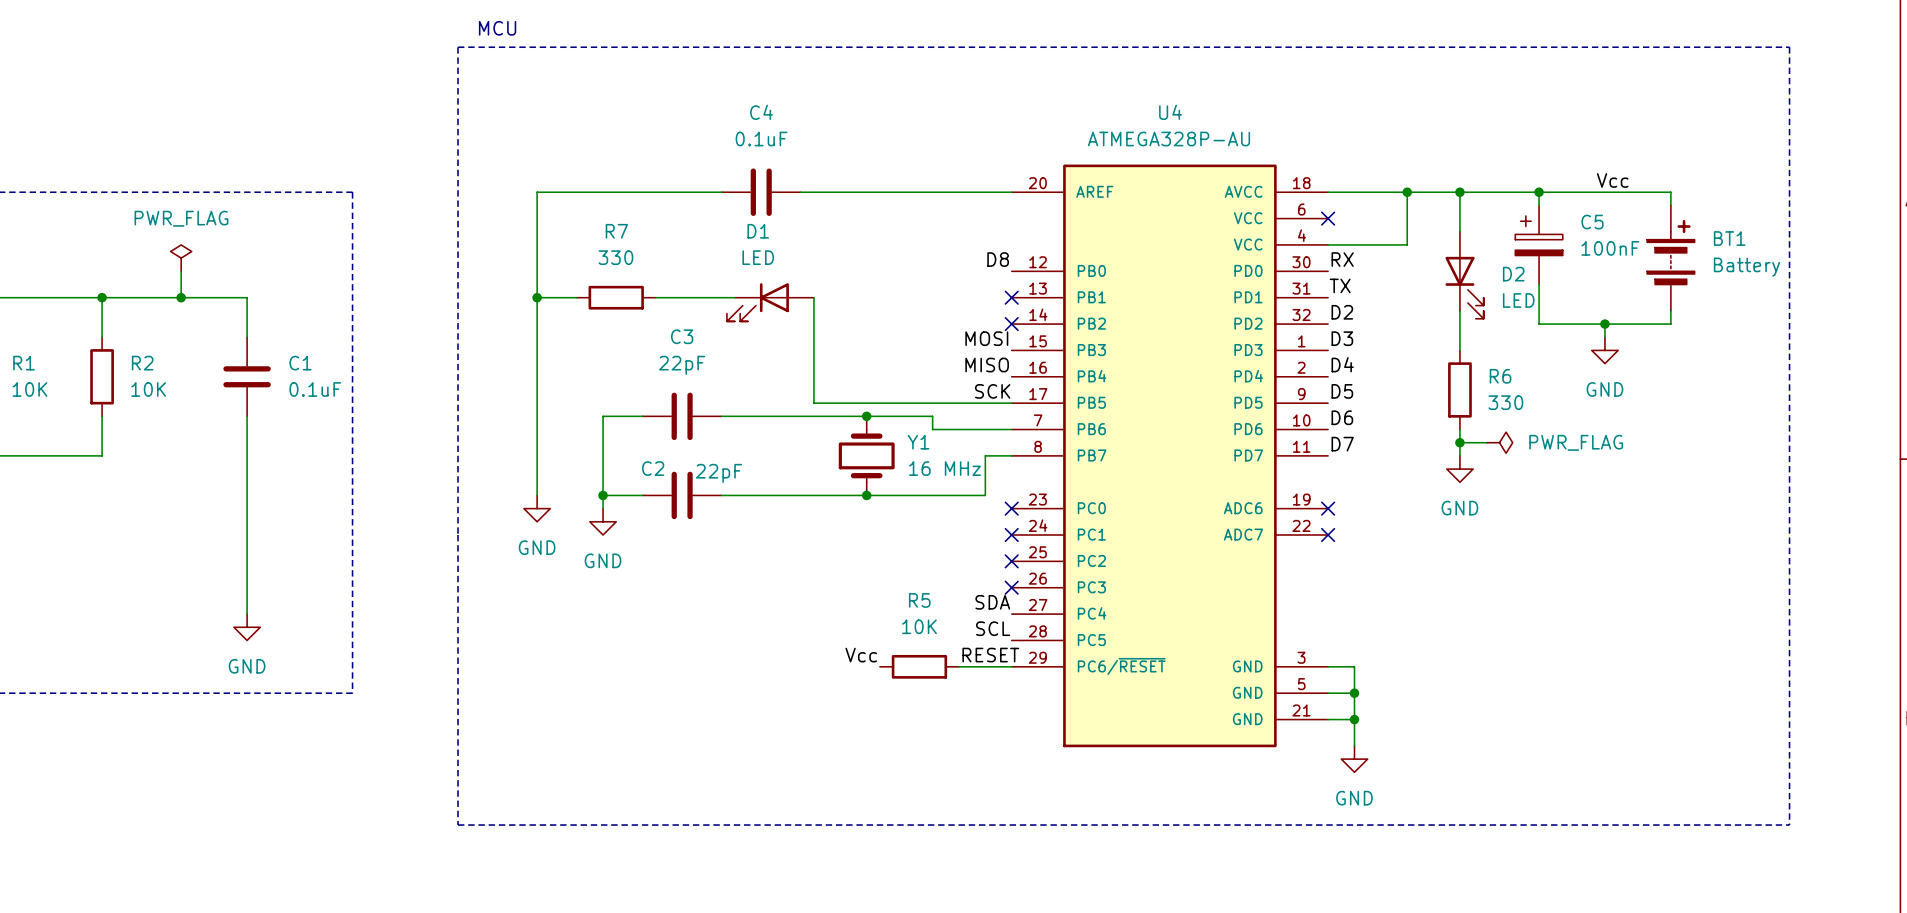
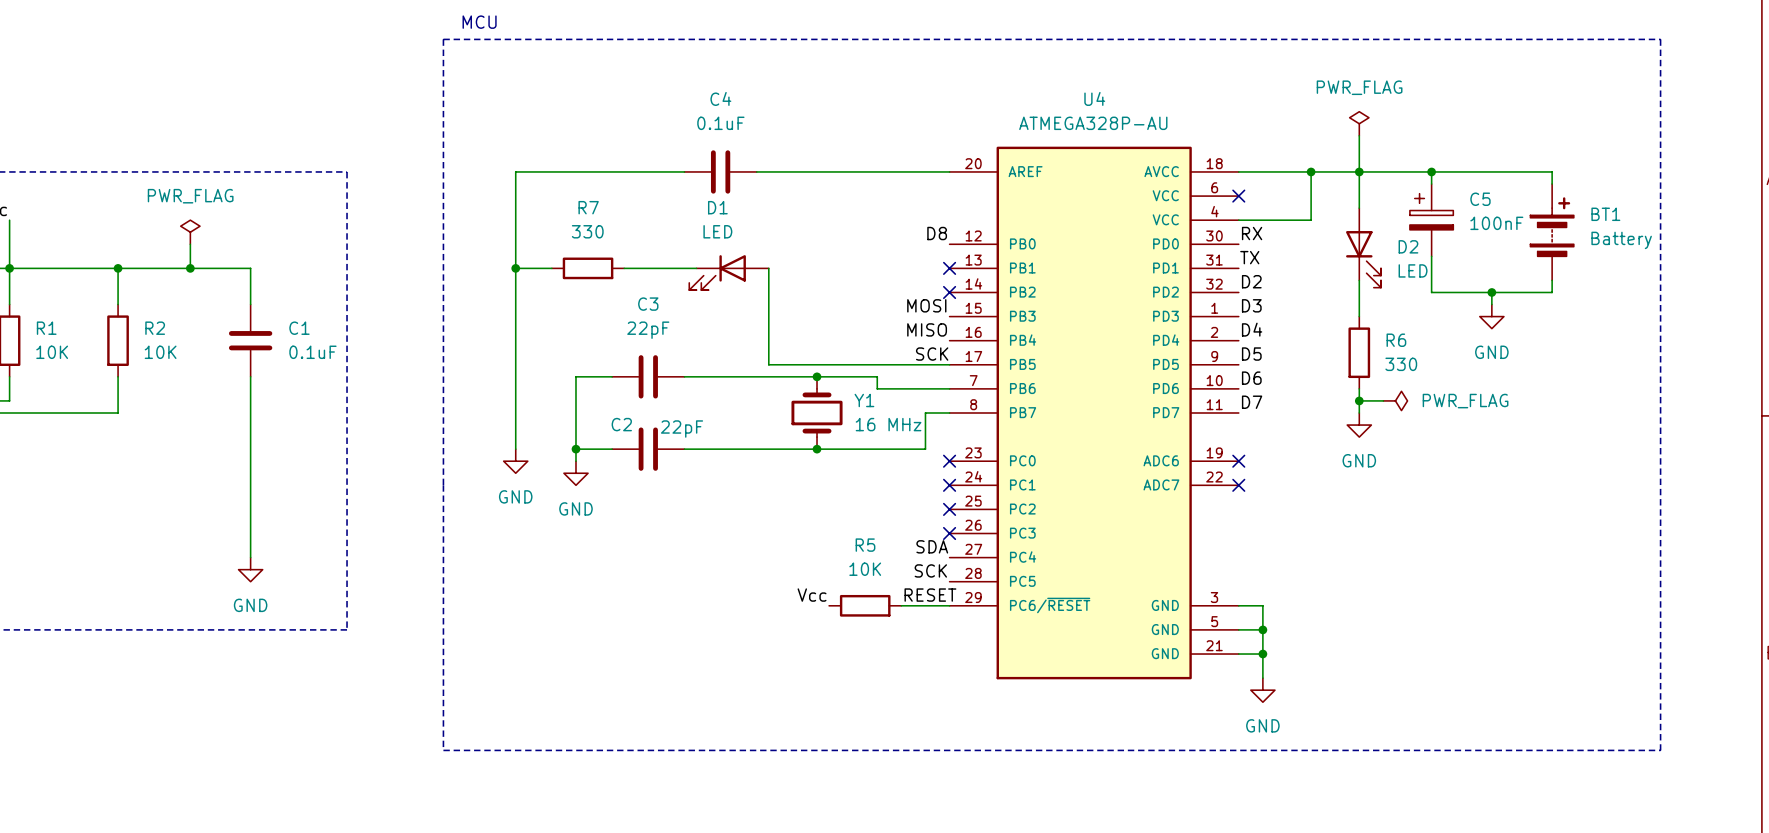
power symbol: none -> PWR_FLAG (1359, 123)
wire: none -> (1359, 135) (1359, 171)
label: Vcc (1612, 180) -> none
label: SCL (993, 628) -> SCK (930, 570)

